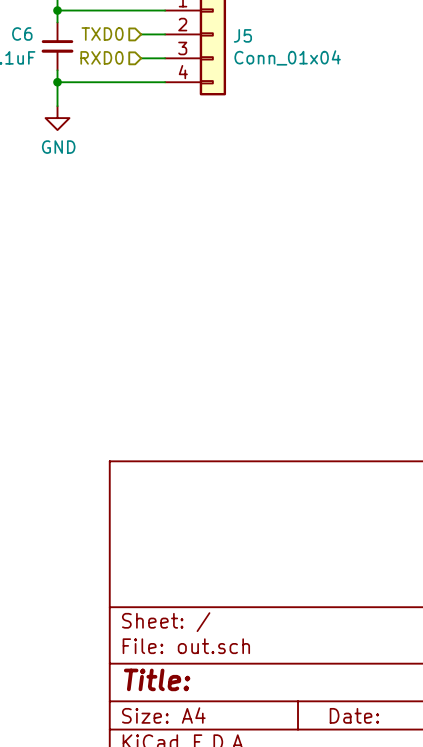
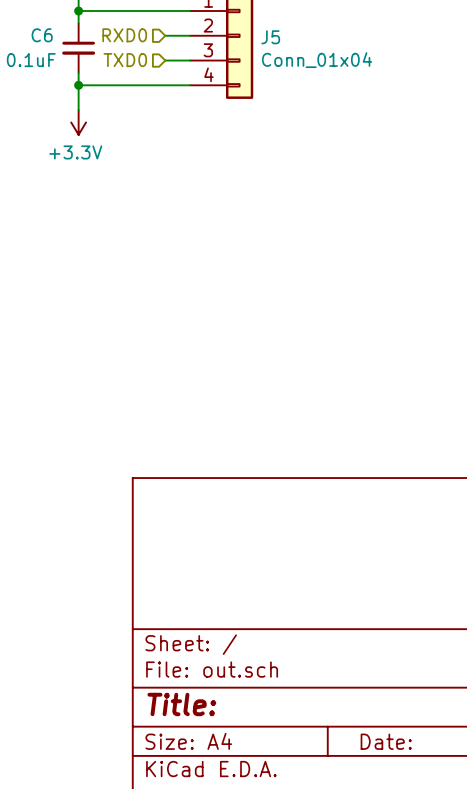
hierarchical label: TXD0 (102, 33) -> RXD0 (124, 35)
hierarchical label: RXD0 (102, 57) -> TXD0 (125, 60)
power symbol: GND (57, 118) -> +3.3V (78, 122)

